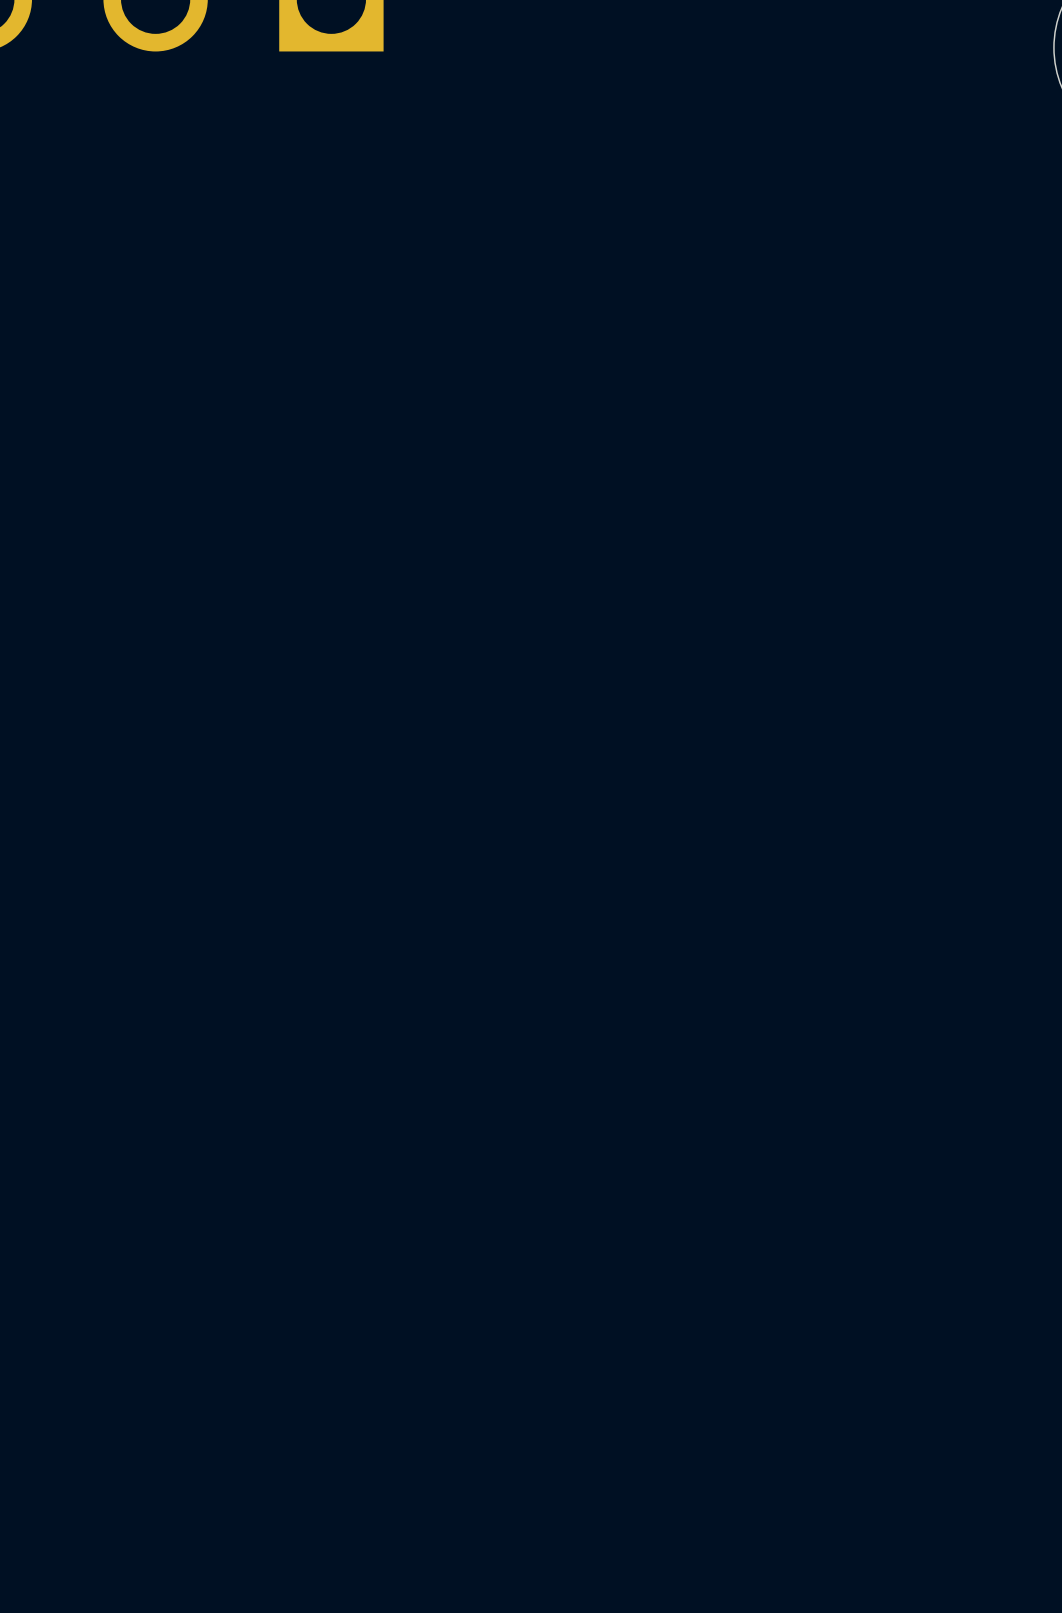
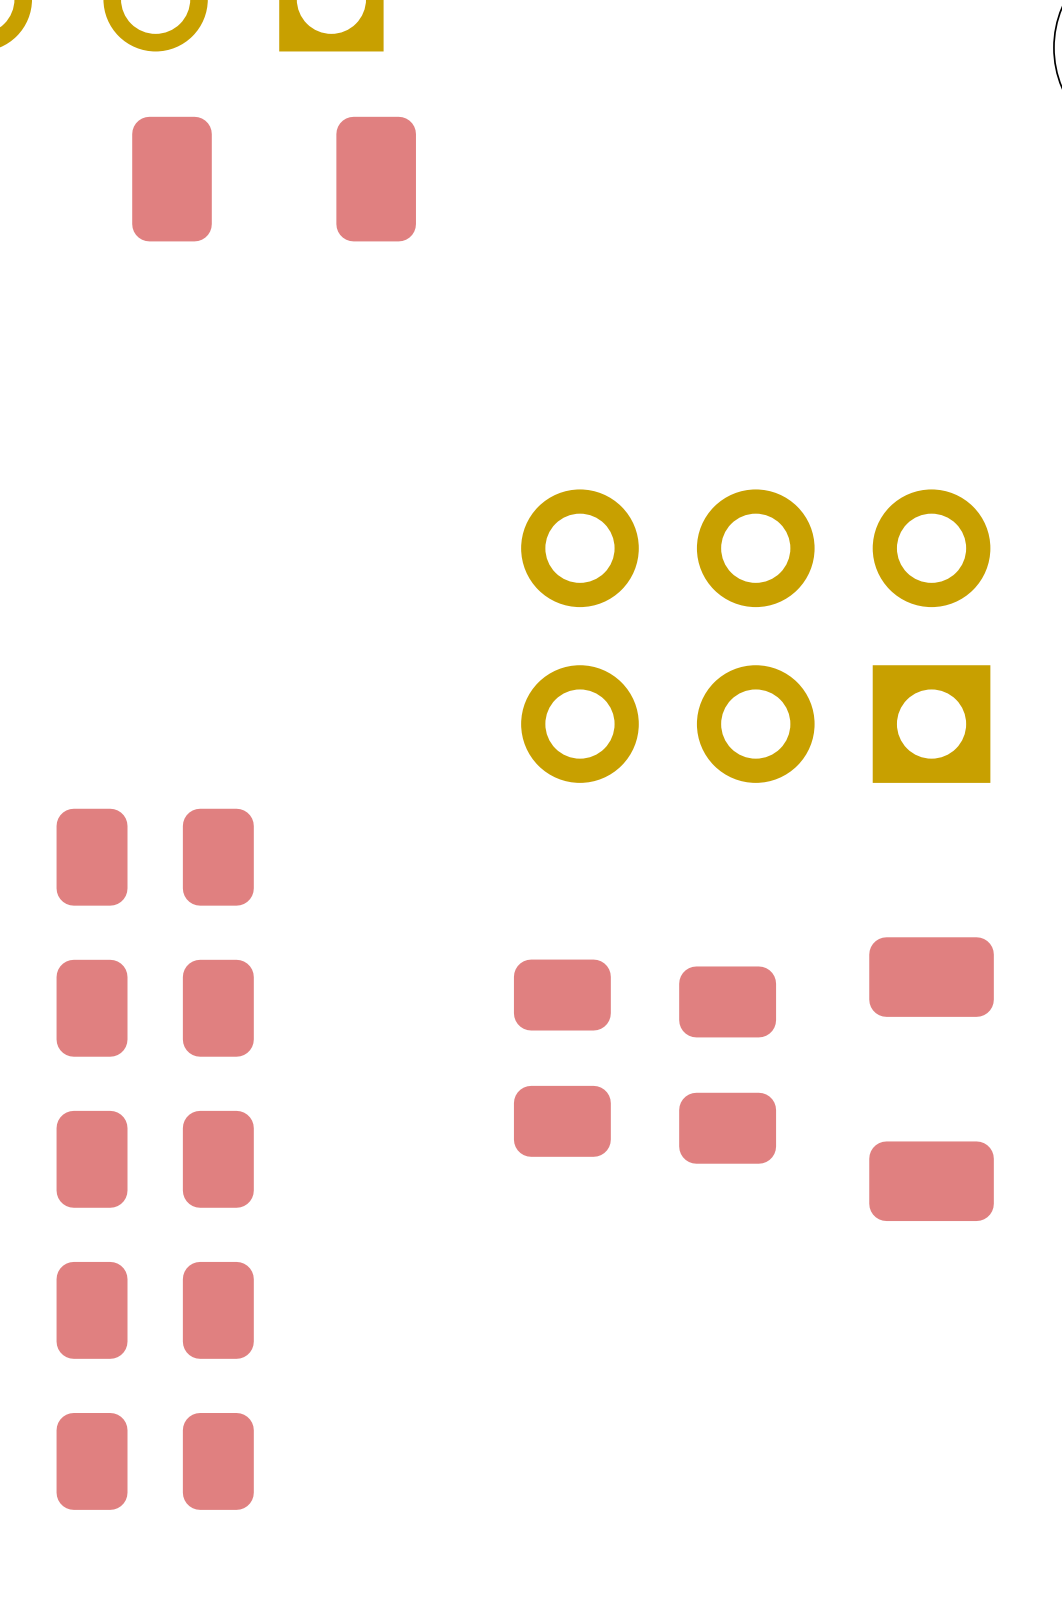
part: none -> (274, 179)
part: none -> (755, 636)
part: none -> (155, 857)
part: none -> (155, 1008)
part: none -> (562, 1058)
part: none -> (727, 1065)
part: none -> (931, 1079)
part: none -> (155, 1159)
part: none -> (155, 1310)
part: none -> (155, 1461)

